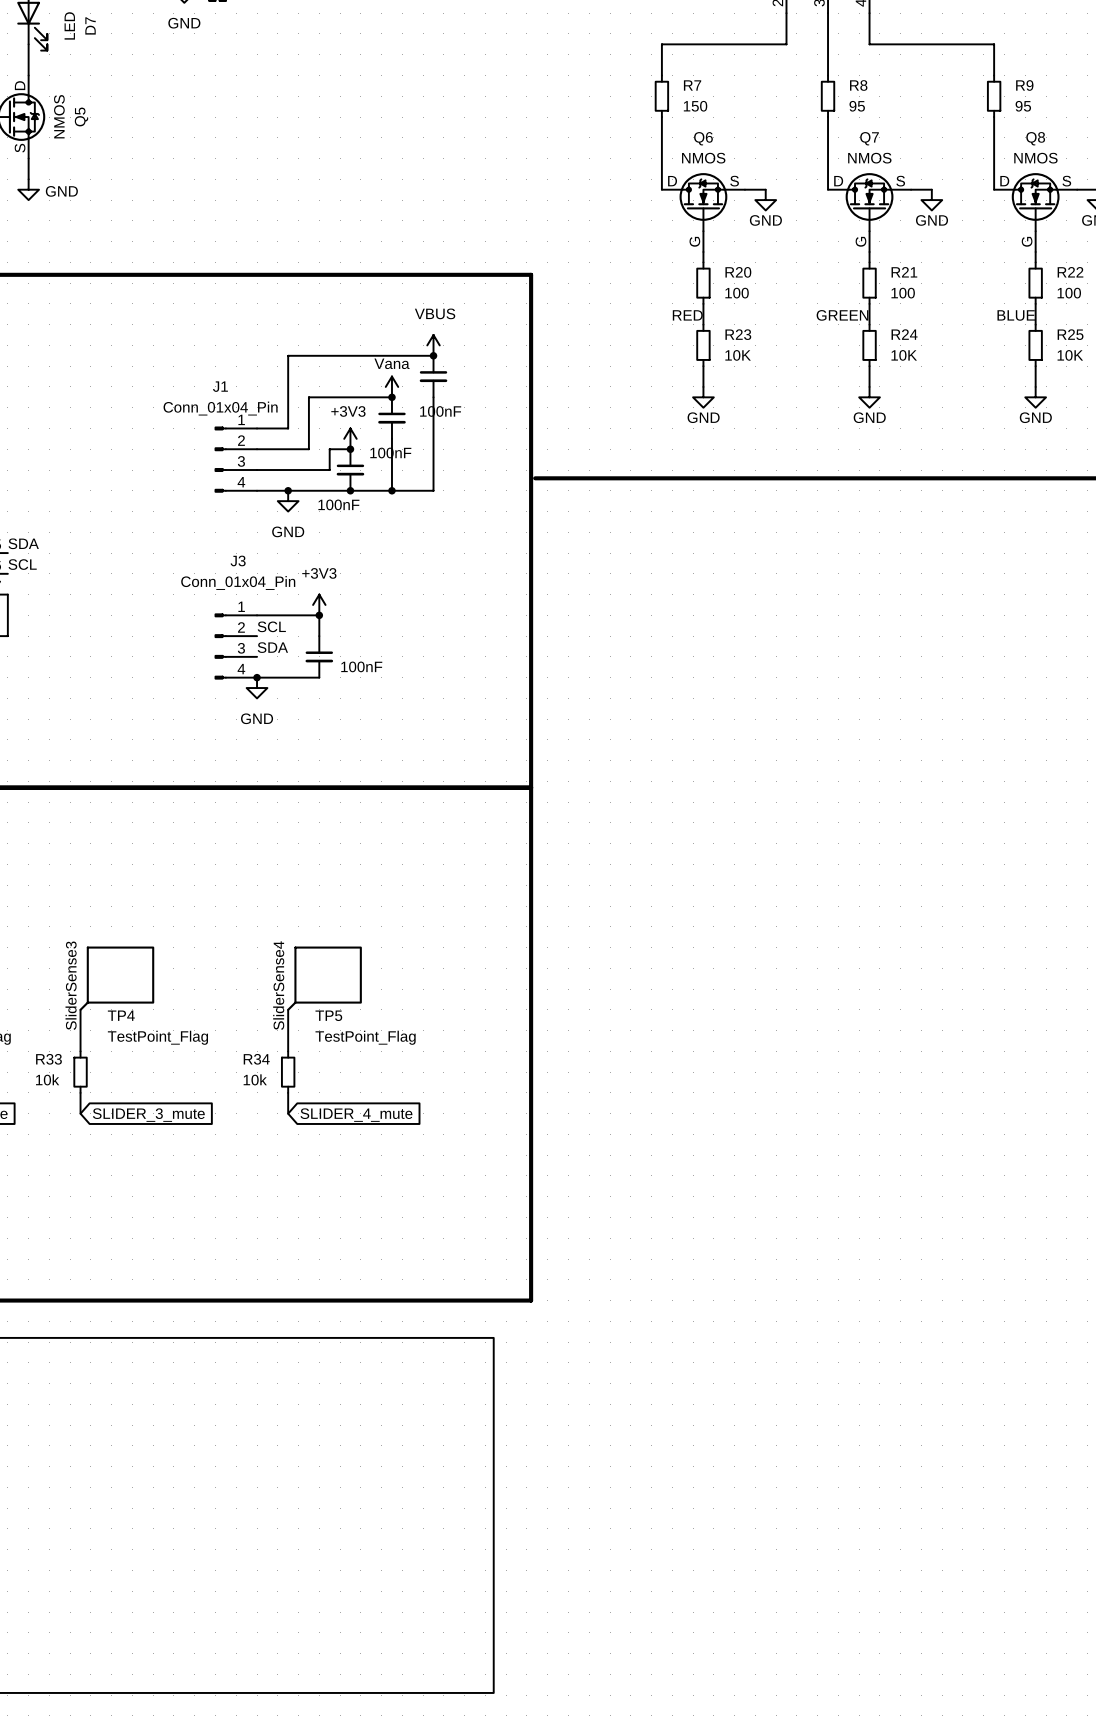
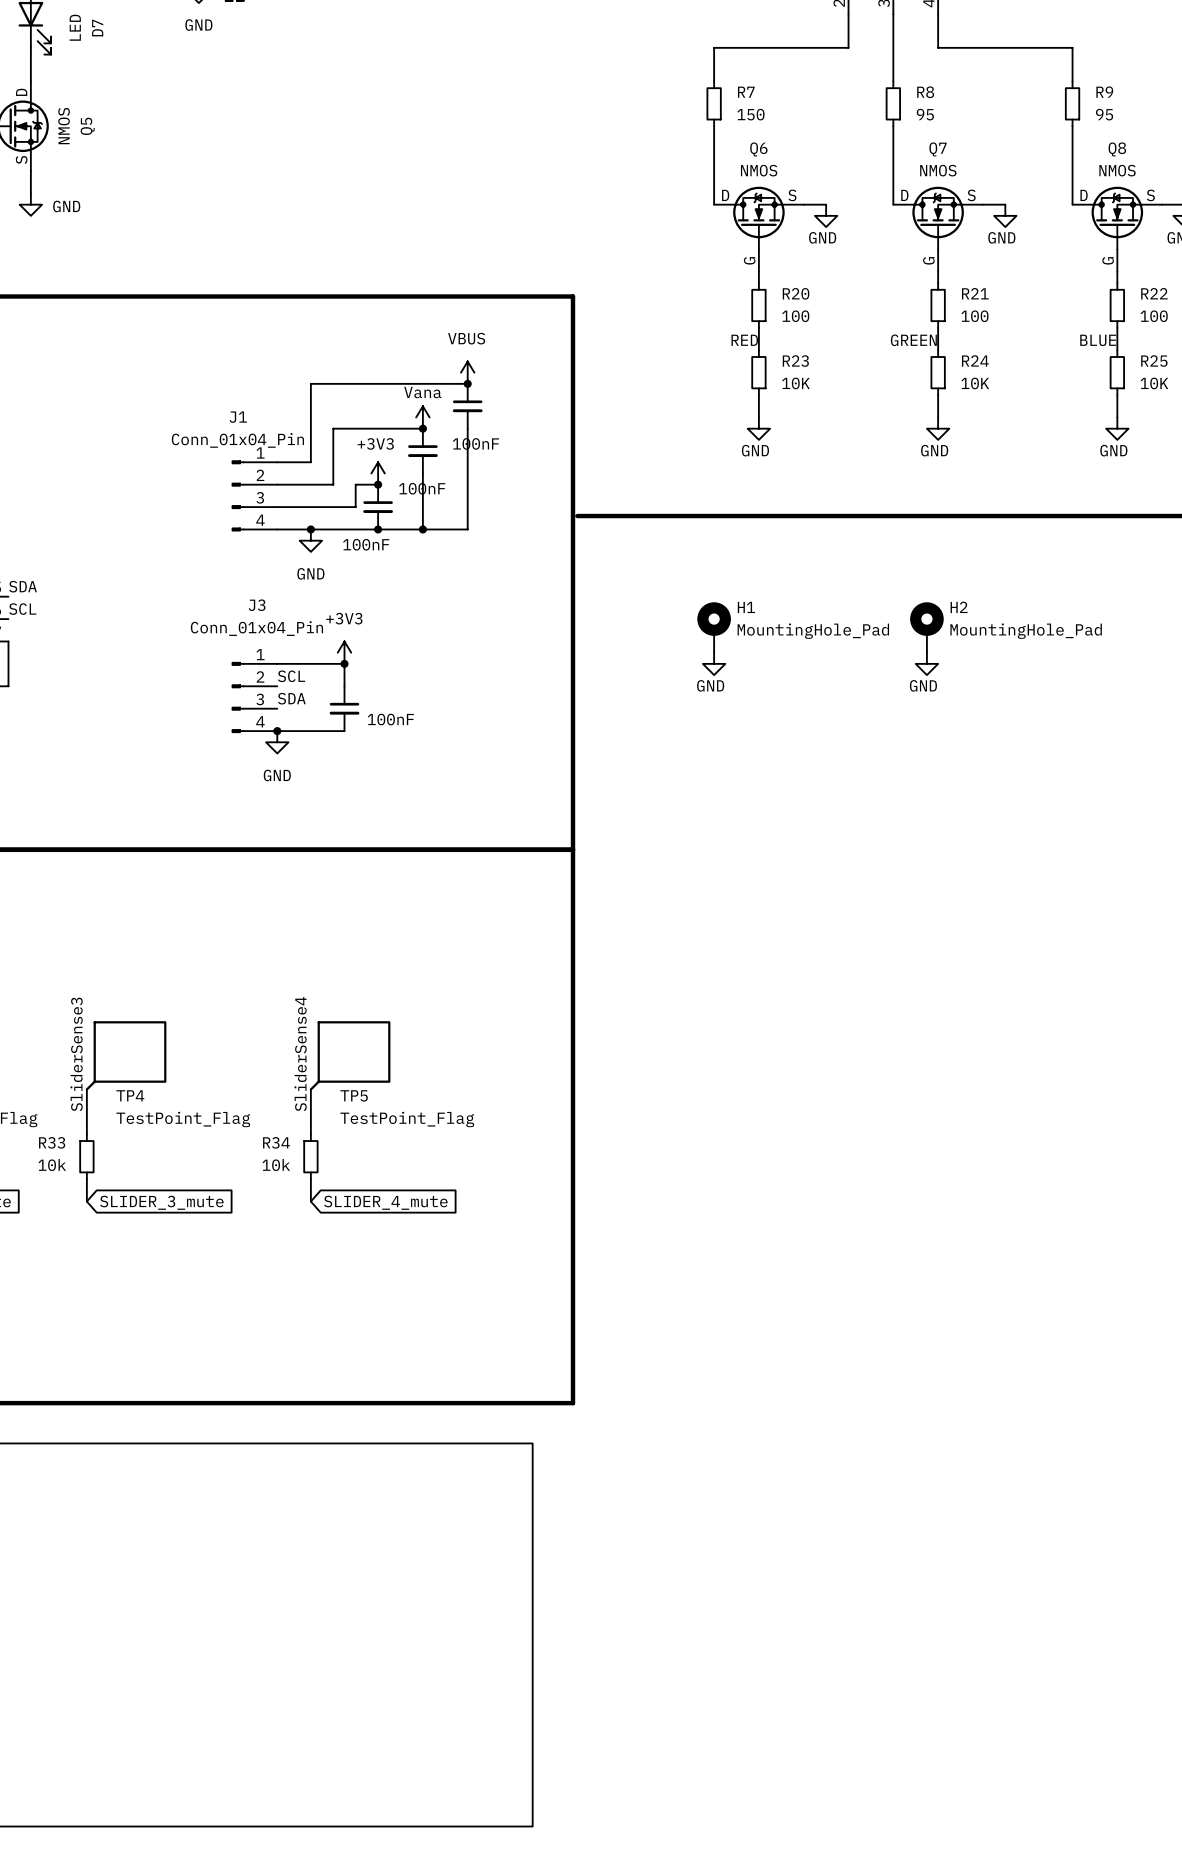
H1: none -> MountingHole_Pad (714, 627)
H2: none -> MountingHole_Pad (926, 627)
power symbol: none -> GND (714, 663)
power symbol: none -> GND (926, 663)

